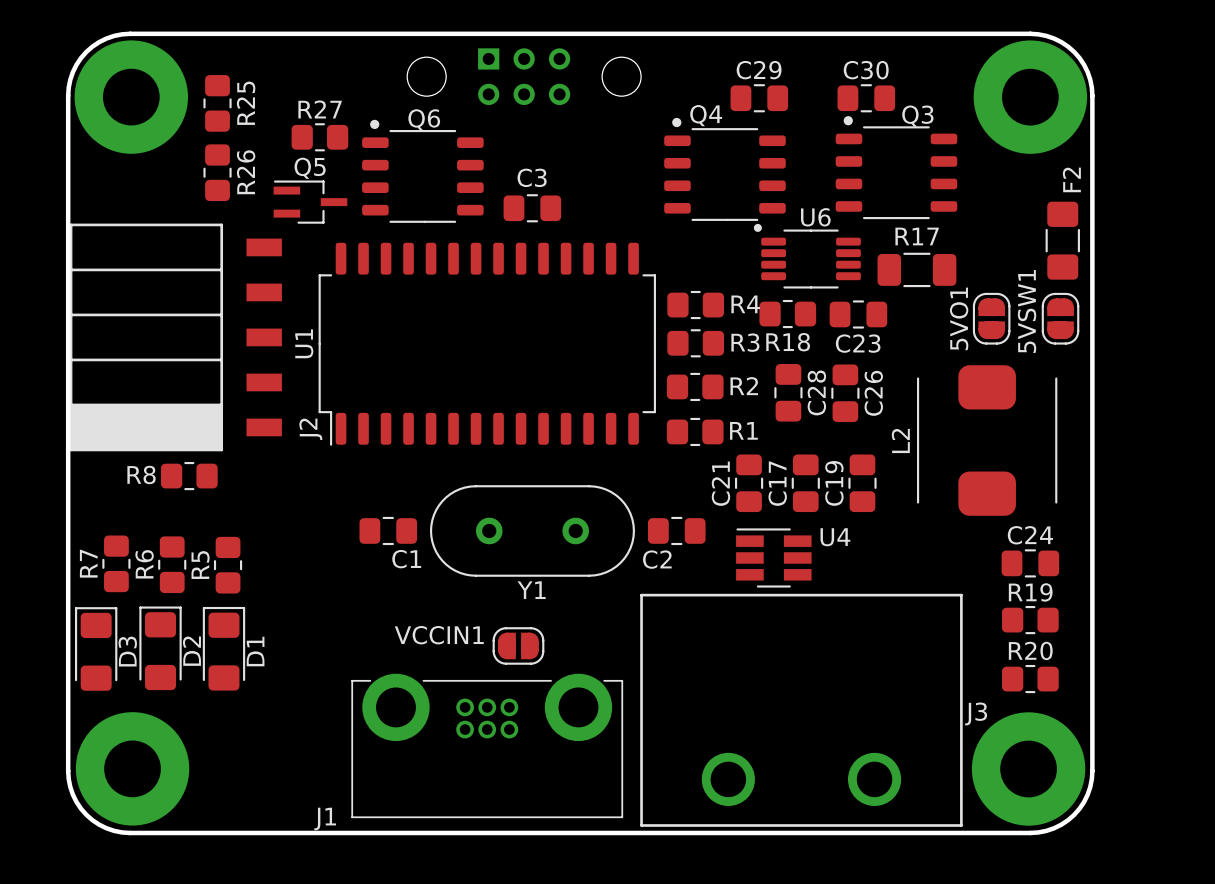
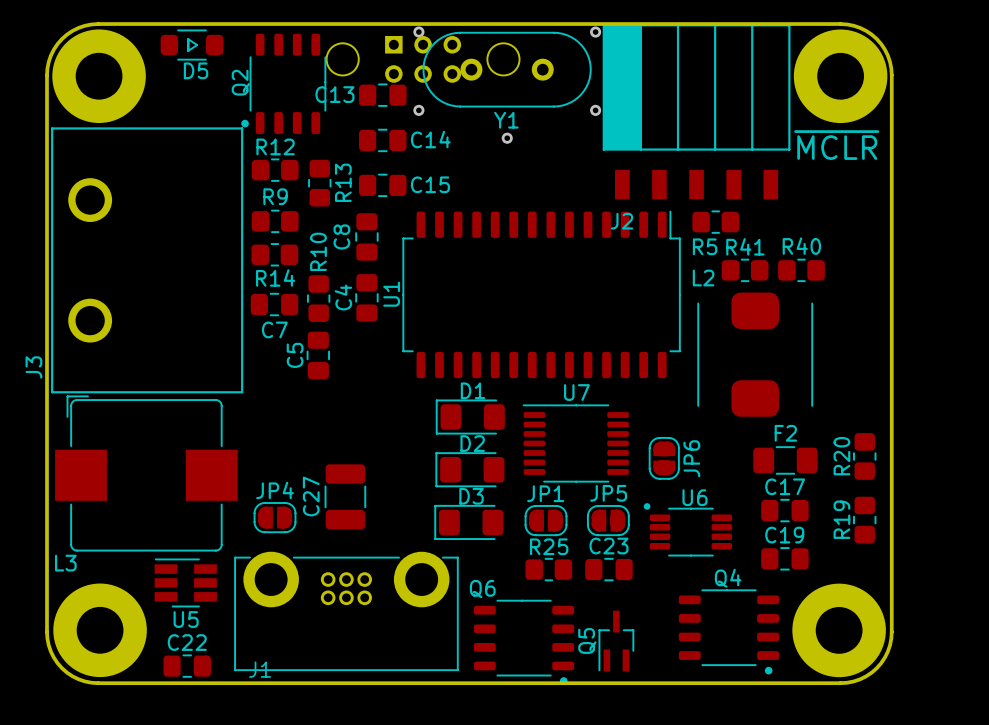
via: none -> (418, 32)
via: none -> (595, 32)
D5: none -> (192, 45)
C29: (759, 98) -> none
C30: (866, 98) -> none
R25 rotation: 0° (217, 103) -> 90° clockwise (548, 569)
R25 position: (217, 103) -> (548, 569)
R25 name position: R25 (246, 103) -> R25 (549, 546)
Q2: none -> (283, 83)
Q6 name position: Q6 (424, 119) -> Q6 (482, 589)
C13: none -> (382, 95)
R27: (319, 137) -> none
via: none -> (418, 110)
via: none -> (595, 110)
Q3: (896, 167) -> none
Q4 rotation: 0° (724, 169) -> 180° (728, 631)
Q4 position: (724, 169) -> (728, 631)
Q6 rotation: 0° (422, 171) -> 180° (524, 642)
Q6 position: (422, 171) -> (524, 642)
R26: (217, 172) -> none
via: none -> (507, 138)
C14: none -> (382, 140)
text: none -> ~{MCLR} (836, 145)
Q5 rotation: 0° (310, 202) -> 90° counterclockwise (616, 640)
Q5 position: (310, 202) -> (616, 640)
C3: (532, 208) -> none
R12: none -> (275, 170)
R13: none -> (319, 183)
C15: none -> (382, 185)
F2 rotation: 0° (1062, 240) -> 90° clockwise (785, 460)
F2 position: (1062, 240) -> (785, 460)
U6 position: (807, 256) -> (687, 529)
R17: (916, 269) -> none
R9: none -> (275, 221)
C8: none -> (366, 236)
R4: (695, 305) -> none
R14: none -> (274, 254)
R18: (787, 314) -> none
C23 position: (858, 314) -> (608, 569)
5VO1: (991, 318) -> none
5VSW1: (1060, 318) -> none
R41: none -> (745, 270)
R40: none -> (801, 270)
J2 rotation: 0° (175, 337) -> 90° clockwise (696, 111)
J2 position: (175, 337) -> (696, 111)
R3: (695, 343) -> none
C23 name position: C23 (858, 343) -> C23 (608, 546)
U1 rotation: 0° (487, 344) -> 180° (541, 294)
C4: none -> (366, 297)
R10: none -> (318, 298)
C7: none -> (274, 304)
R2: (695, 386) -> none
C28: (788, 392) -> none
C26: (845, 393) -> none
R1: (695, 431) -> none
C5: none -> (318, 355)
L2 name rotation: 0° (900, 440) -> 90° clockwise (703, 277)
L2 name position: L2 (900, 440) -> L2 (703, 277)
L2 position: (987, 440) -> (755, 354)
R8: (189, 476) -> none
C21: (749, 483) -> none
C17 rotation: 0° (805, 483) -> 90° clockwise (784, 510)
C17 position: (805, 483) -> (784, 510)
C19 rotation: 0° (862, 483) -> 90° clockwise (784, 558)
C19 position: (862, 483) -> (784, 558)
C1: (388, 530) -> none
Y1 rotation: 0° (532, 530) -> 180° (507, 69)
Y1 position: (532, 530) -> (507, 69)
C2: (676, 530) -> none
U7: none -> (575, 443)
U4: (773, 557) -> none
JP6: none -> (664, 458)
R7: (116, 563) -> none
C24: (1030, 563) -> none
R6: (172, 564) -> none
R5 rotation: 0° (228, 565) -> 90° clockwise (715, 222)
R5 position: (228, 565) -> (715, 222)
L3: none -> (146, 473)
R19 name position: R19 (1030, 592) -> R19 (841, 519)
C27: none -> (345, 496)
R19 rotation: 0° (1030, 620) -> 90° clockwise (864, 520)
JP4: none -> (275, 517)
JP1: none -> (546, 520)
JP5: none -> (608, 520)
VCCIN1: (518, 645) -> none
D3 rotation: 0° (96, 648) -> 90° counterclockwise (468, 522)
D3 position: (96, 648) -> (468, 522)
D2 rotation: 0° (160, 648) -> 90° counterclockwise (469, 469)
D2 position: (160, 648) -> (469, 469)
D1 rotation: 0° (223, 648) -> 90° counterclockwise (470, 417)
D1 position: (223, 648) -> (470, 417)
R20 name position: R20 (1030, 650) -> R20 (841, 456)
R20 rotation: 0° (1030, 679) -> 90° clockwise (864, 456)
R20 position: (1030, 679) -> (864, 456)
J3 rotation: 0° (801, 710) -> 90° clockwise (147, 260)
J3 position: (801, 710) -> (147, 260)
U5: none -> (185, 582)
J3 name position: J3 (976, 713) -> J3 (33, 367)
J1 position: (487, 745) -> (346, 611)
C22: none -> (187, 666)

